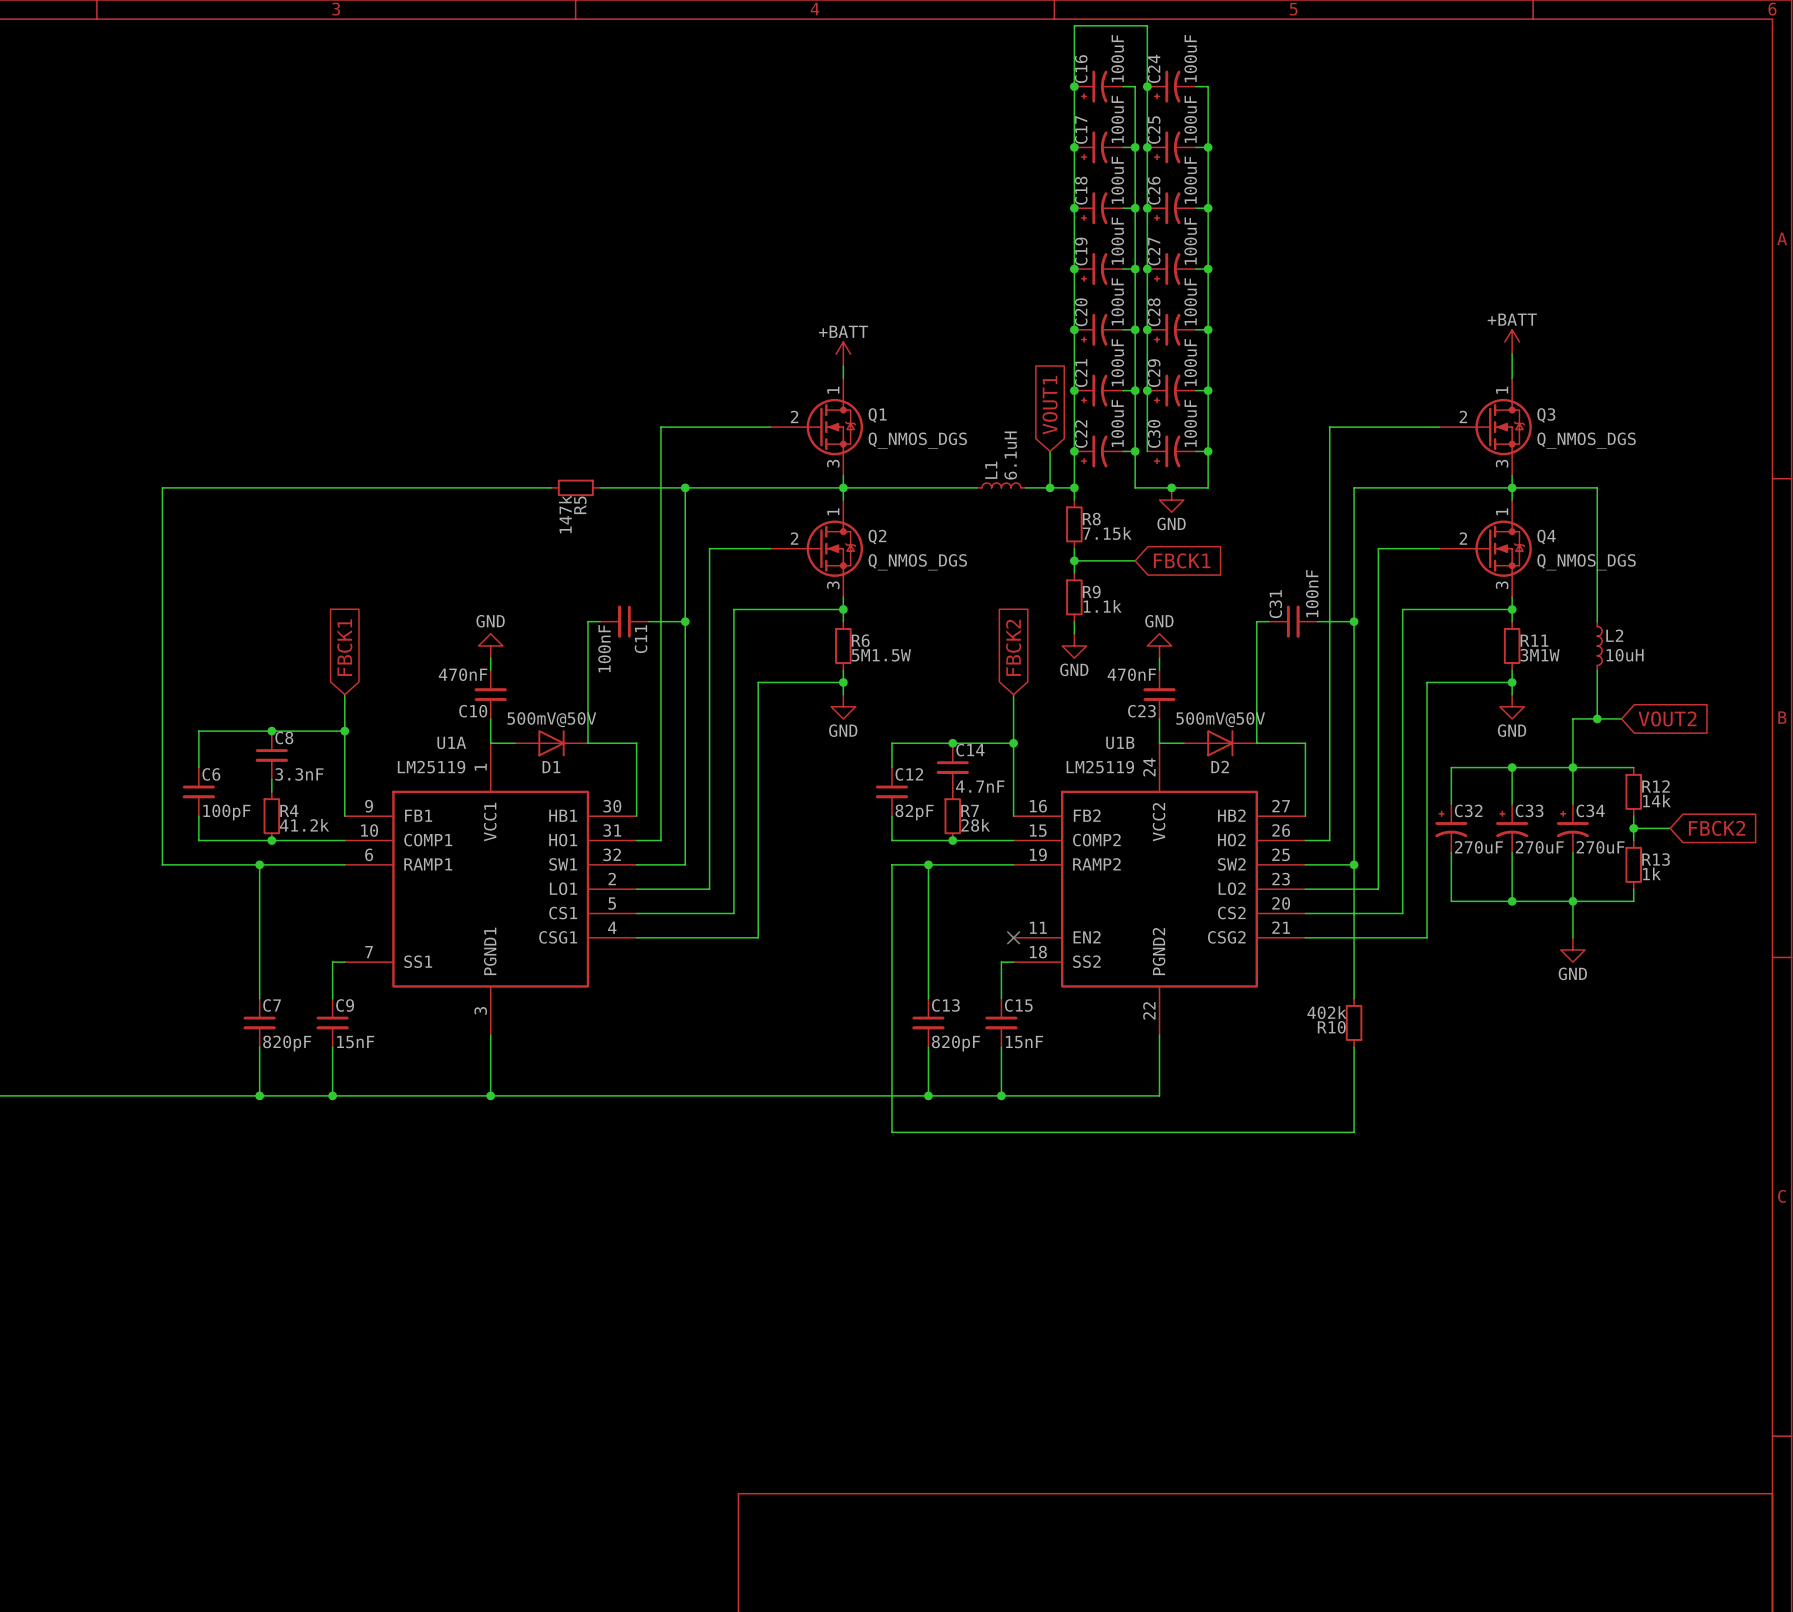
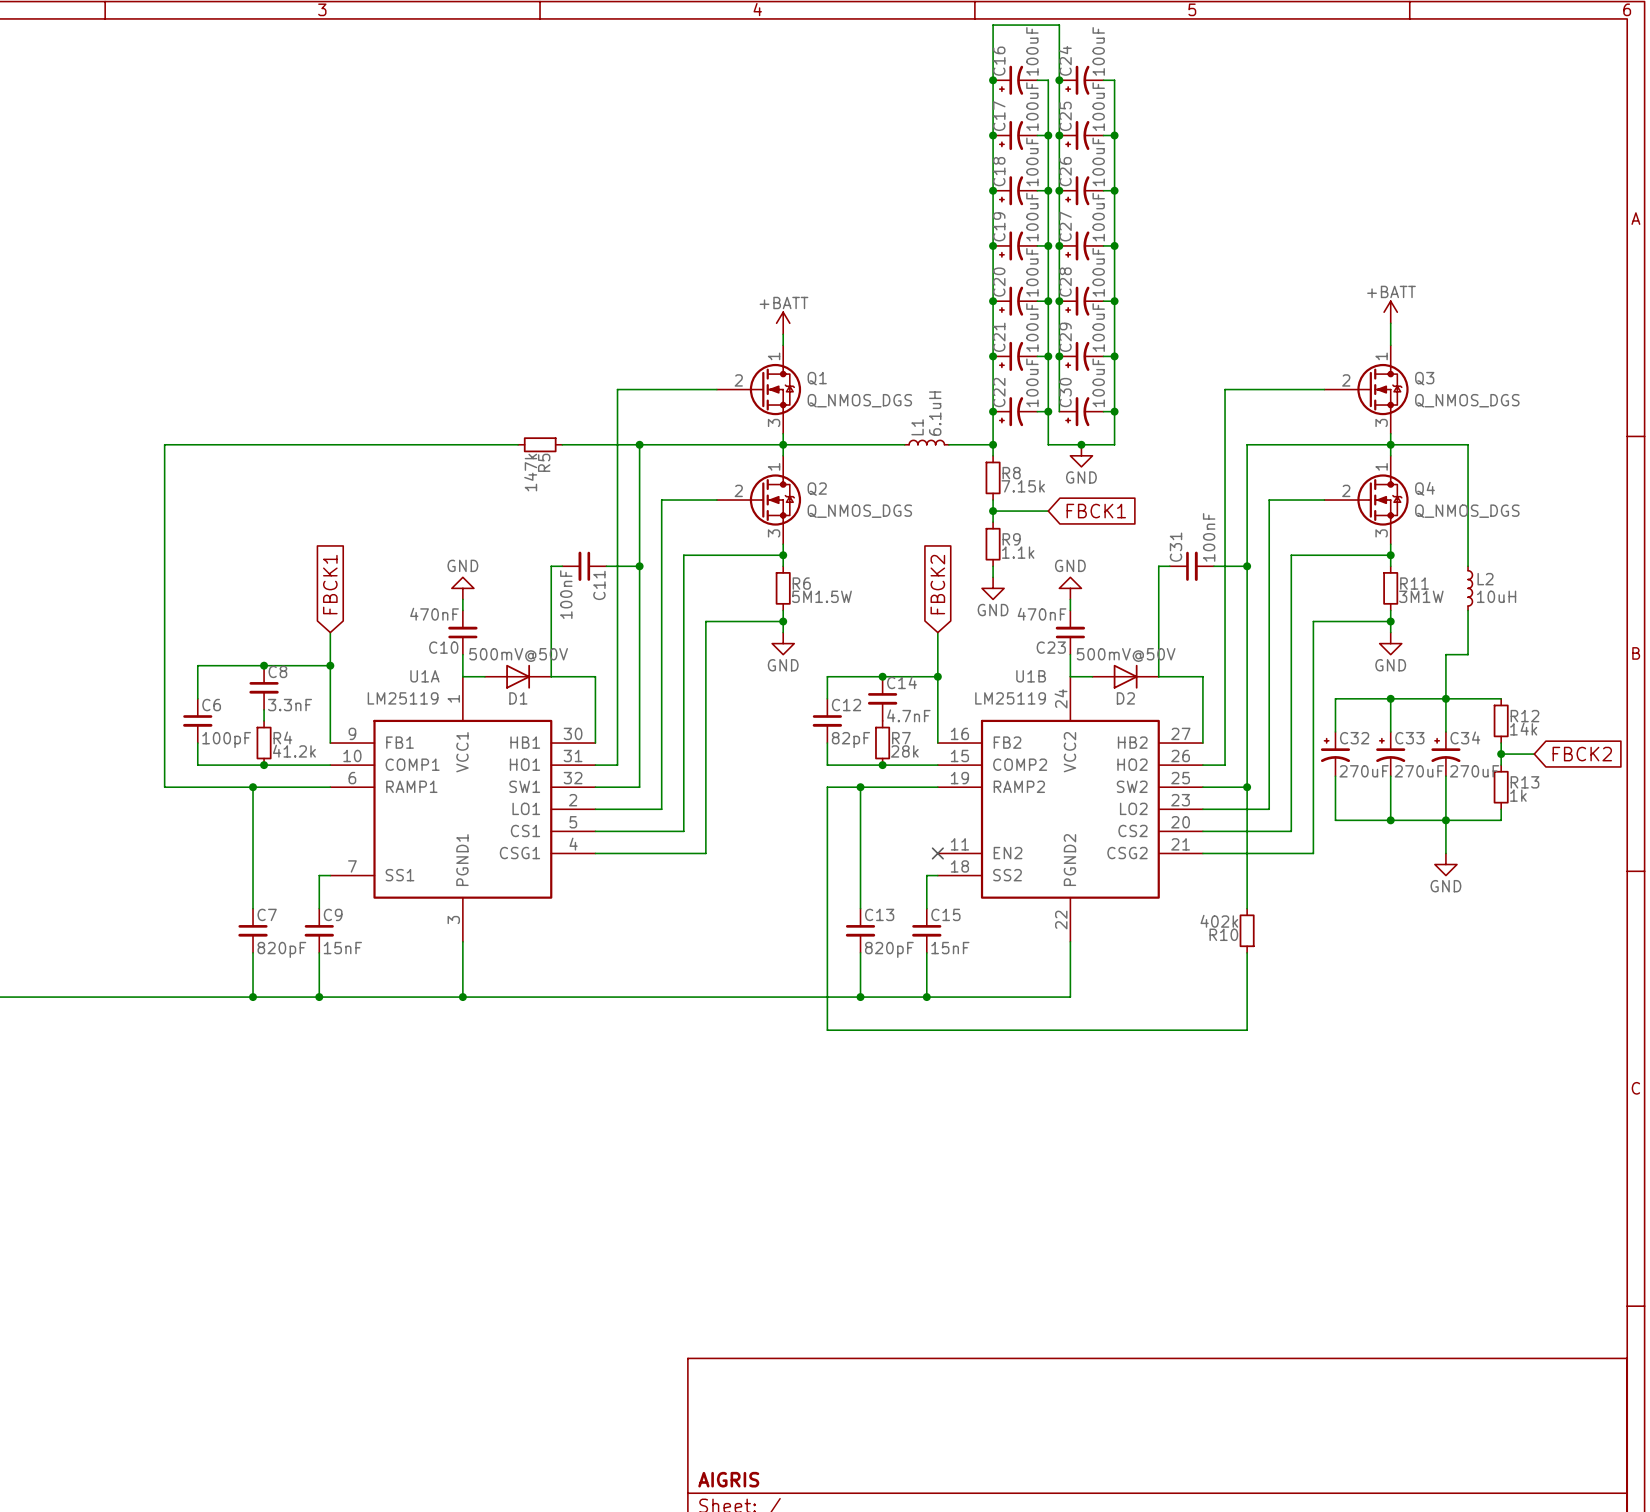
global label: VOUT1 (1050, 405) -> none
wire: (1050, 451) (1050, 487) -> none
junction: (1050, 487) -> none
wire: (1597, 718) (1621, 718) -> none
junction: (1597, 718) -> none
global label: VOUT2 (1667, 718) -> none

